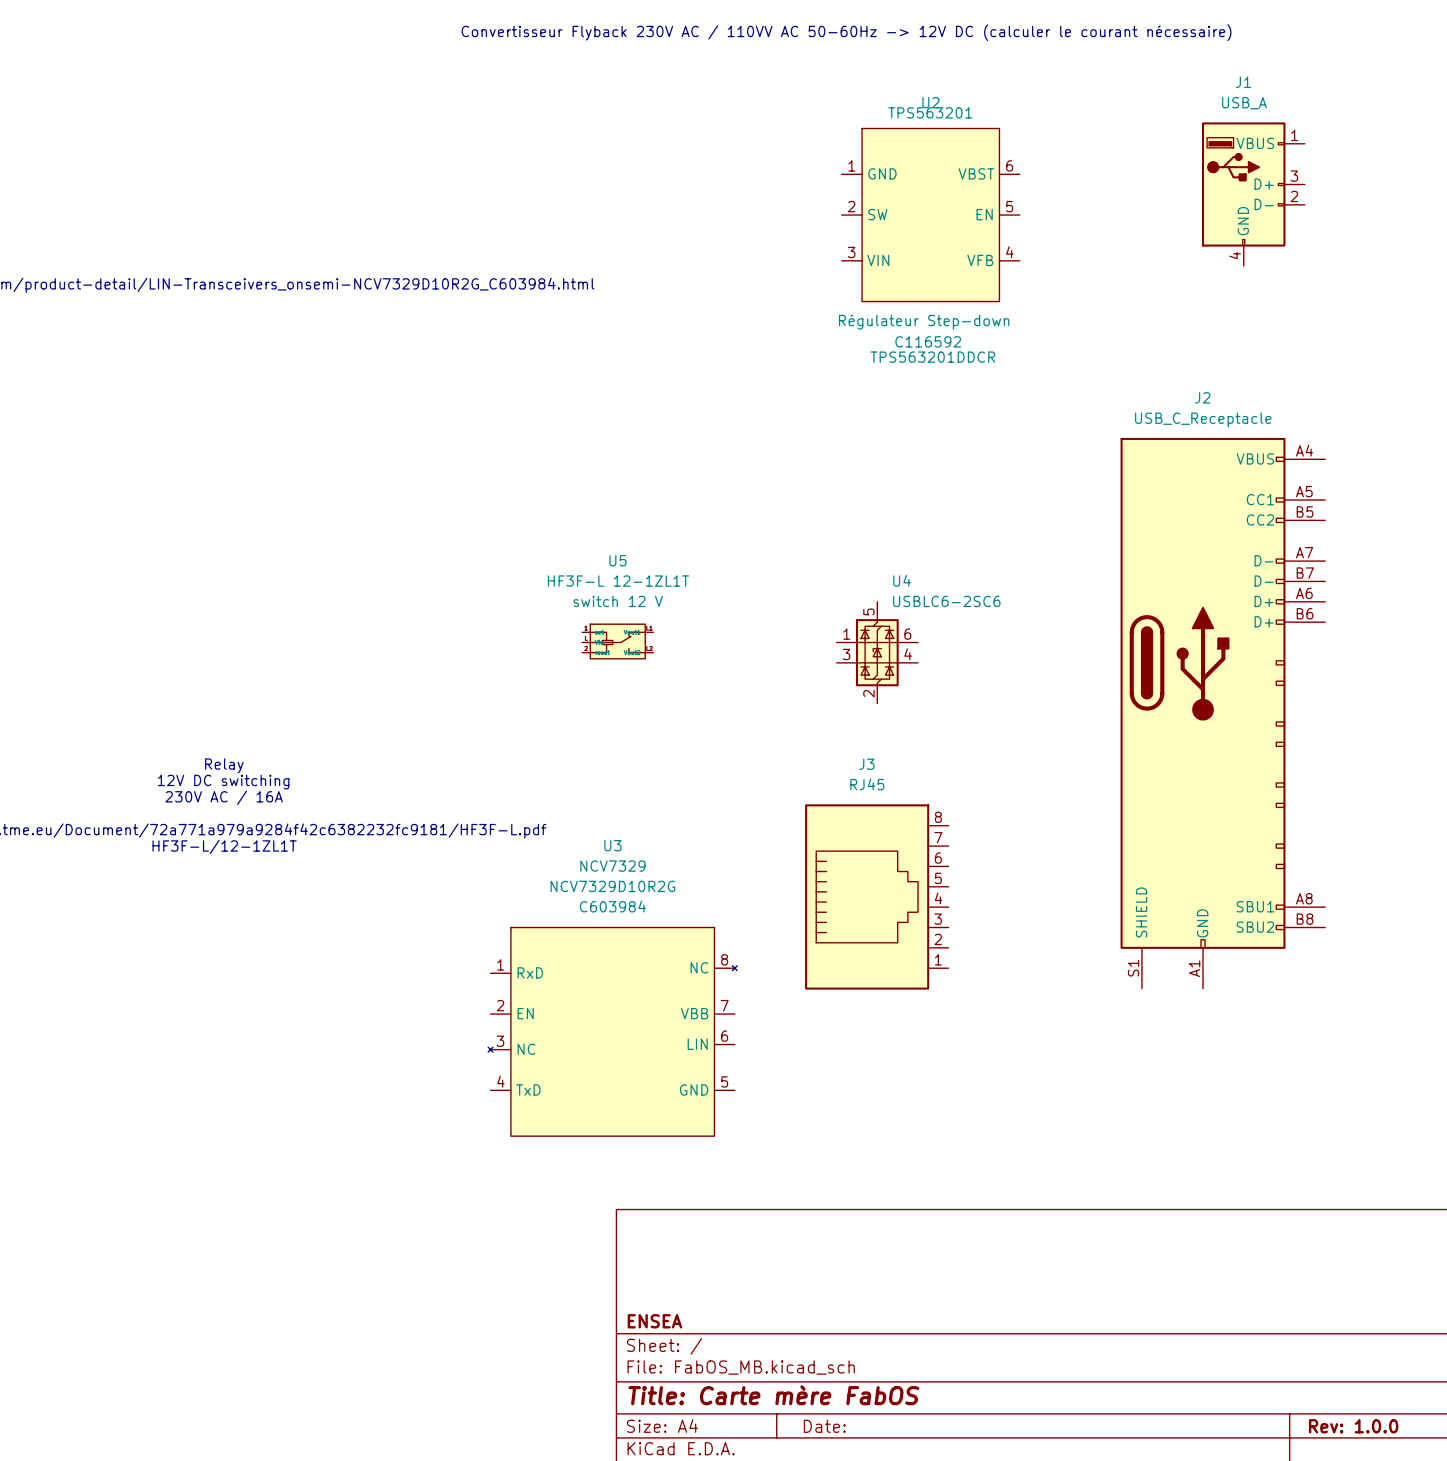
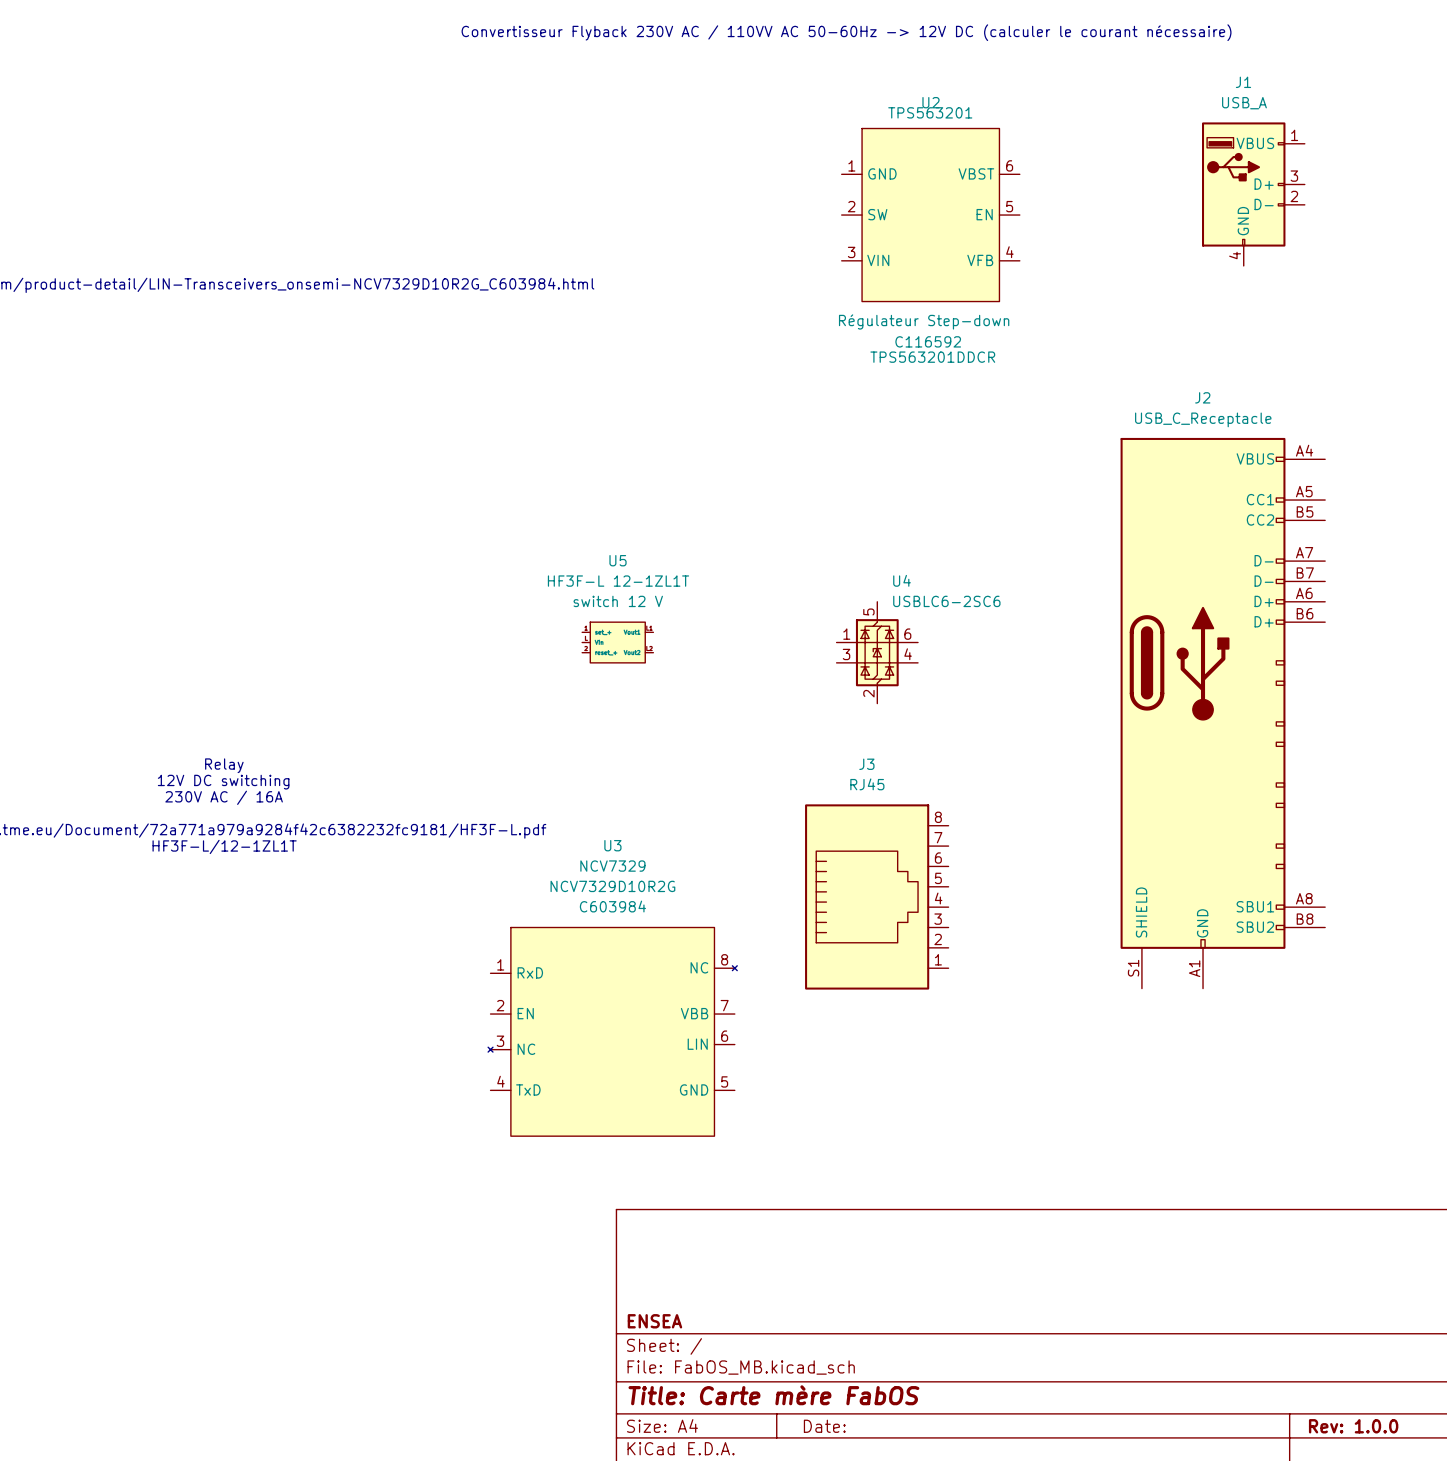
U5 symbol: [582, 624, 654, 659] -> [582, 622, 654, 663]

